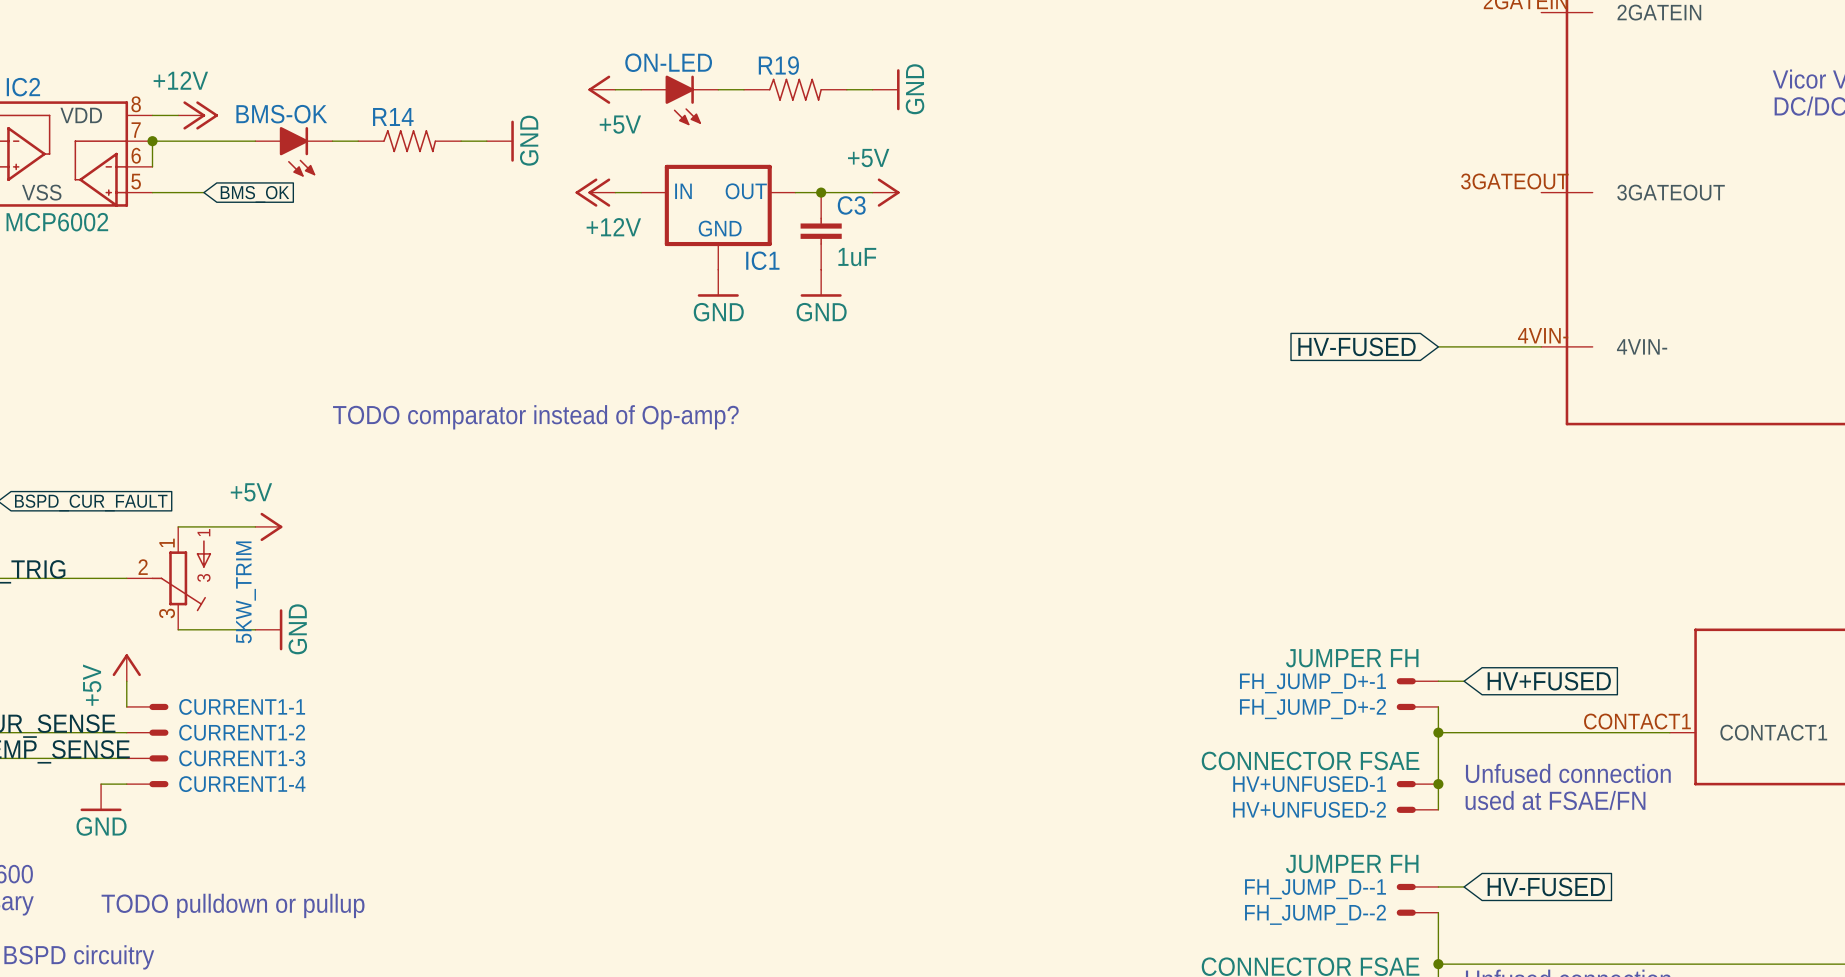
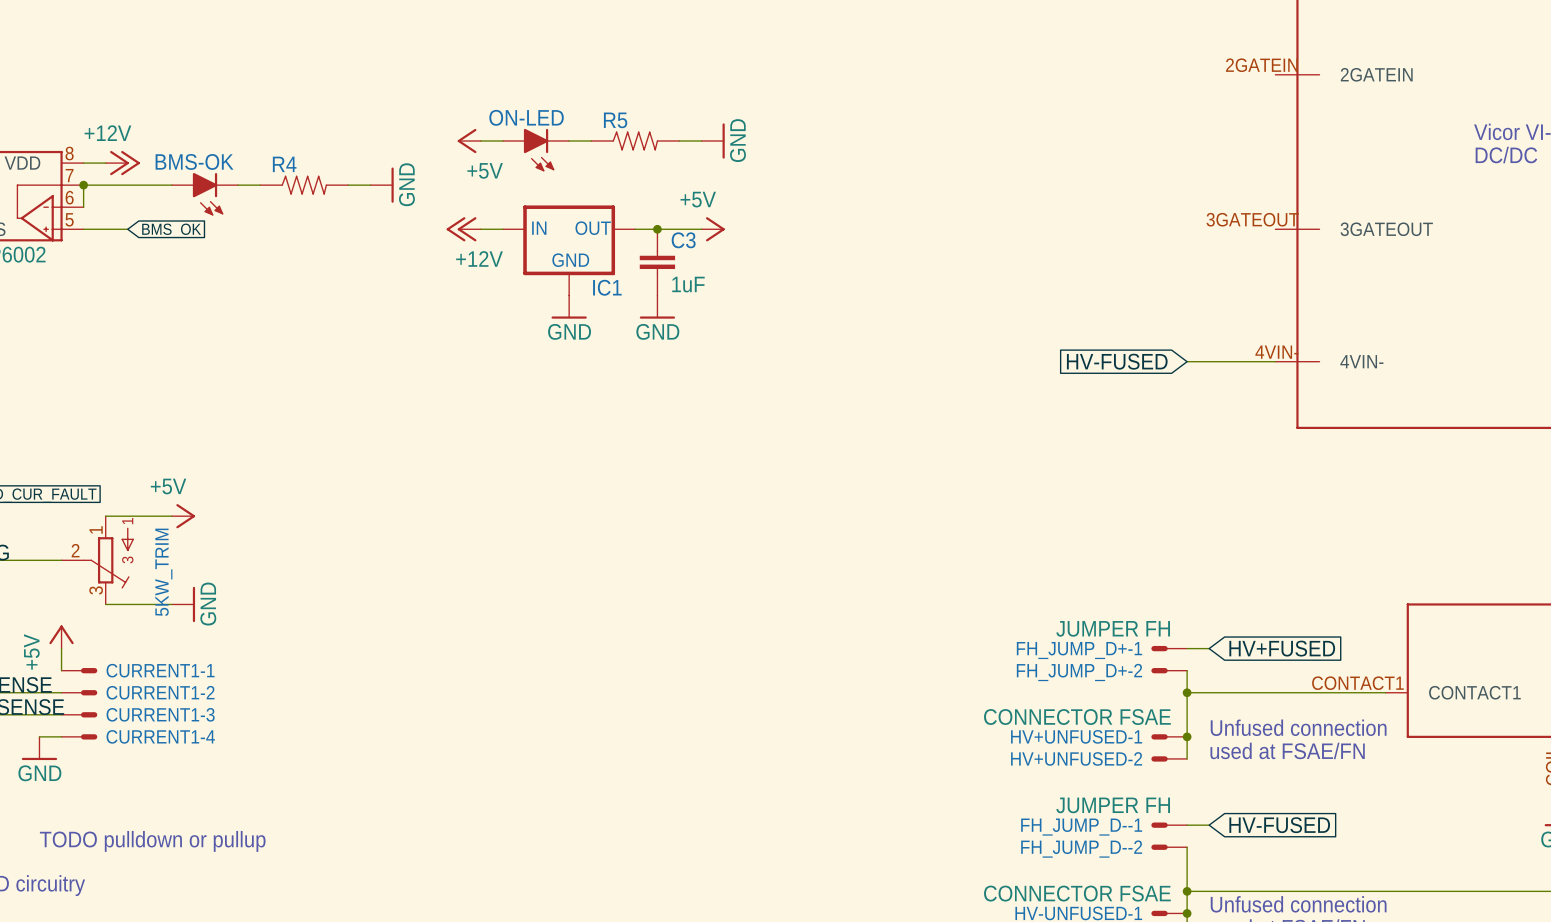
R19 name: R19 (778, 65) -> R5 (615, 120)
R14 name: R14 (393, 116) -> R4 (284, 164)
text: TODO comparator instead of Op-amp? (535, 417) -> none

